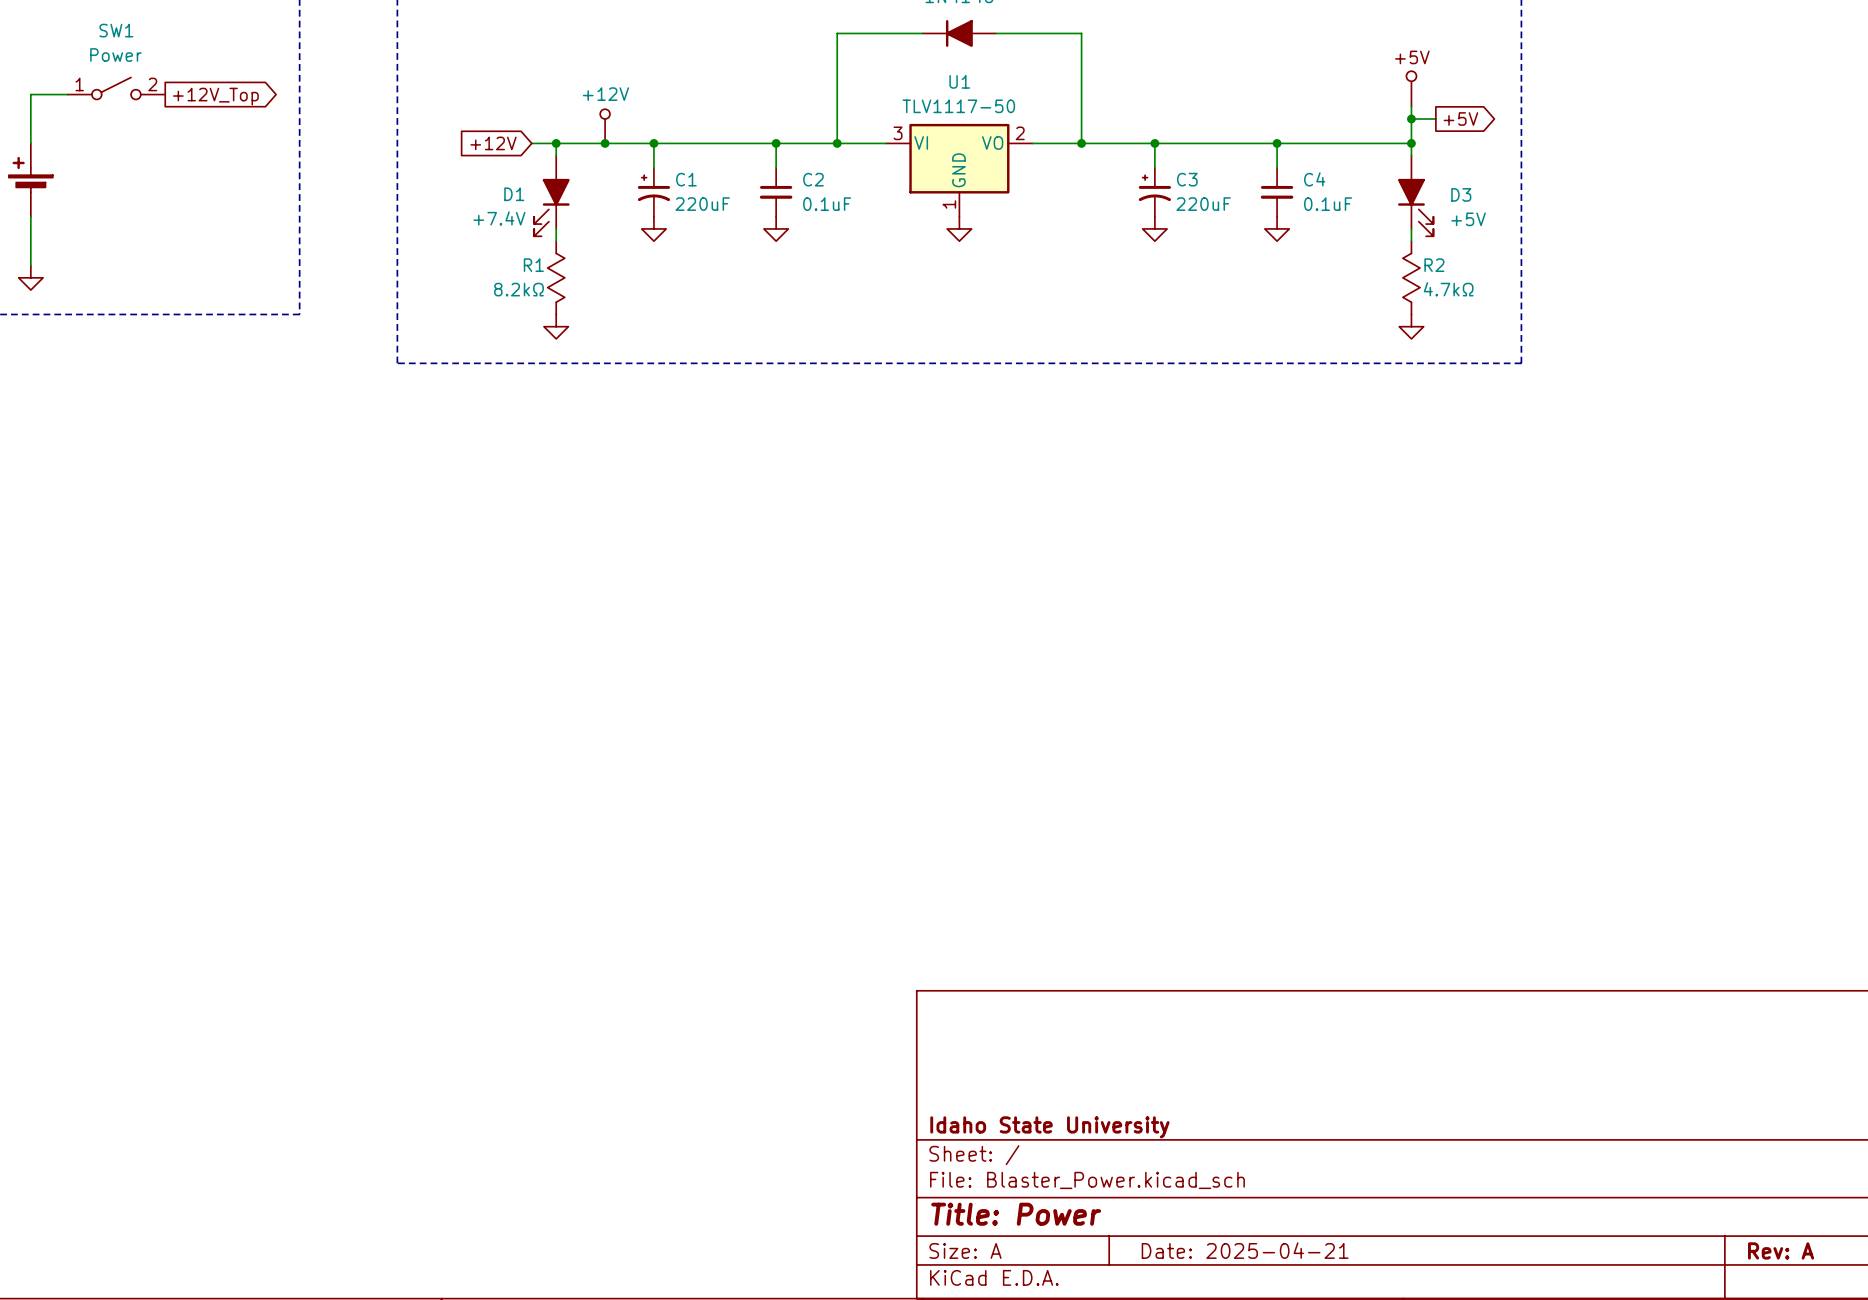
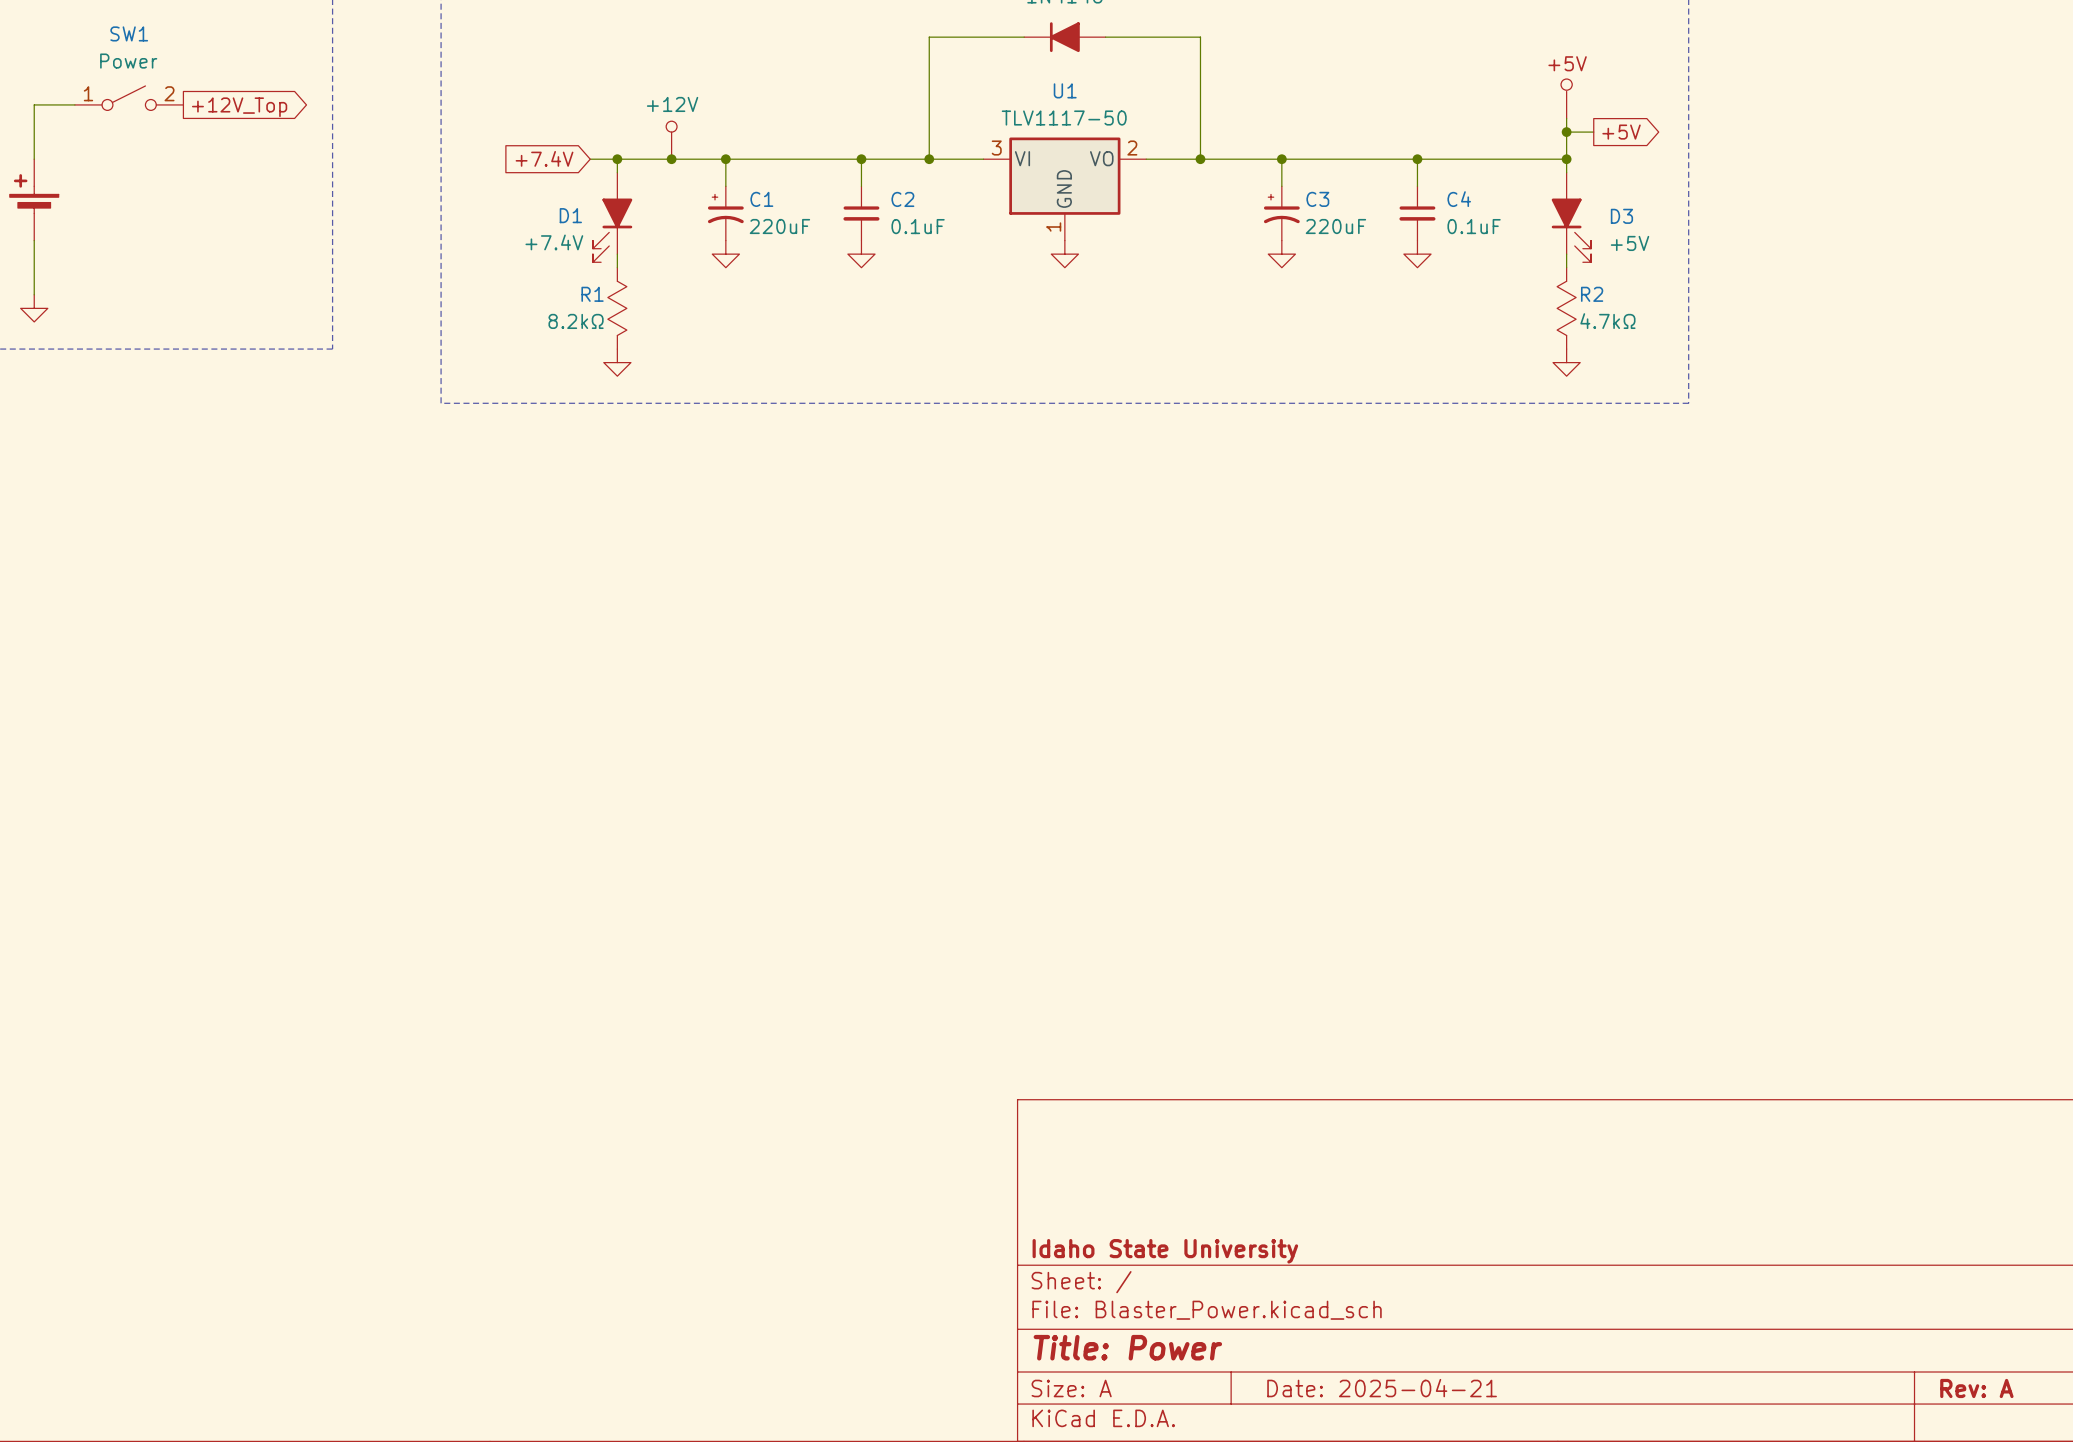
global label: +12V (493, 143) -> +7.4V (544, 158)

